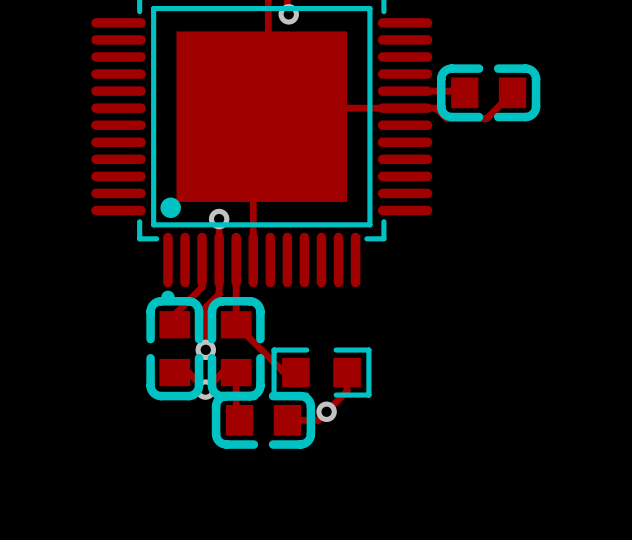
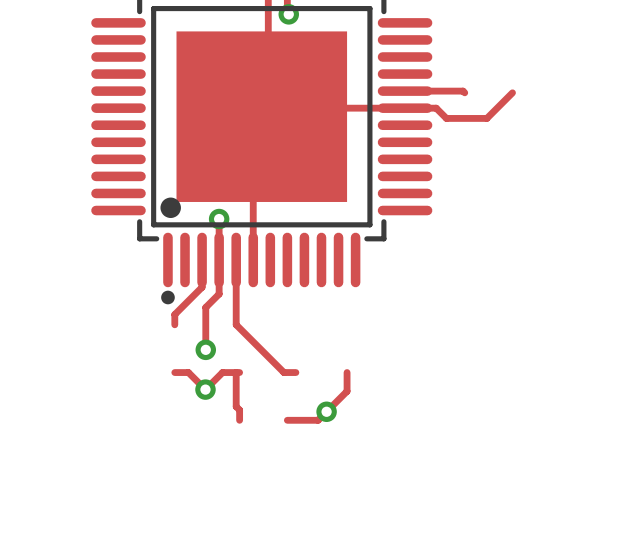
part: (488, 92) -> none
part: (174, 348) -> none
part: (236, 348) -> none
part: (321, 372) -> none
part: (263, 420) -> none

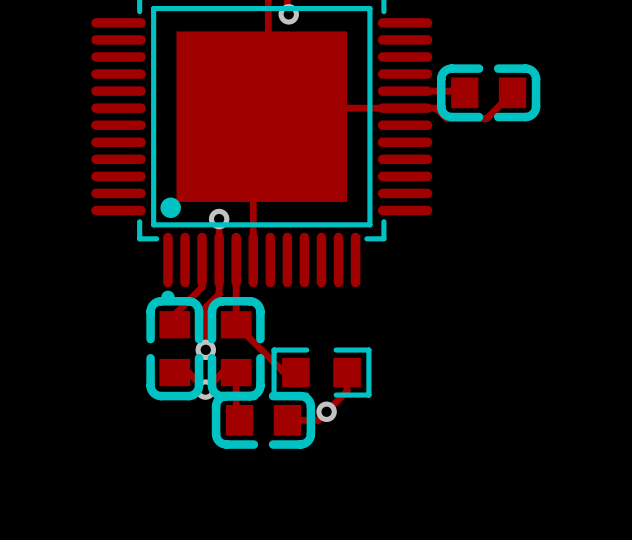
part: none -> (488, 92)
part: none -> (174, 348)
part: none -> (236, 348)
part: none -> (321, 372)
part: none -> (263, 420)

